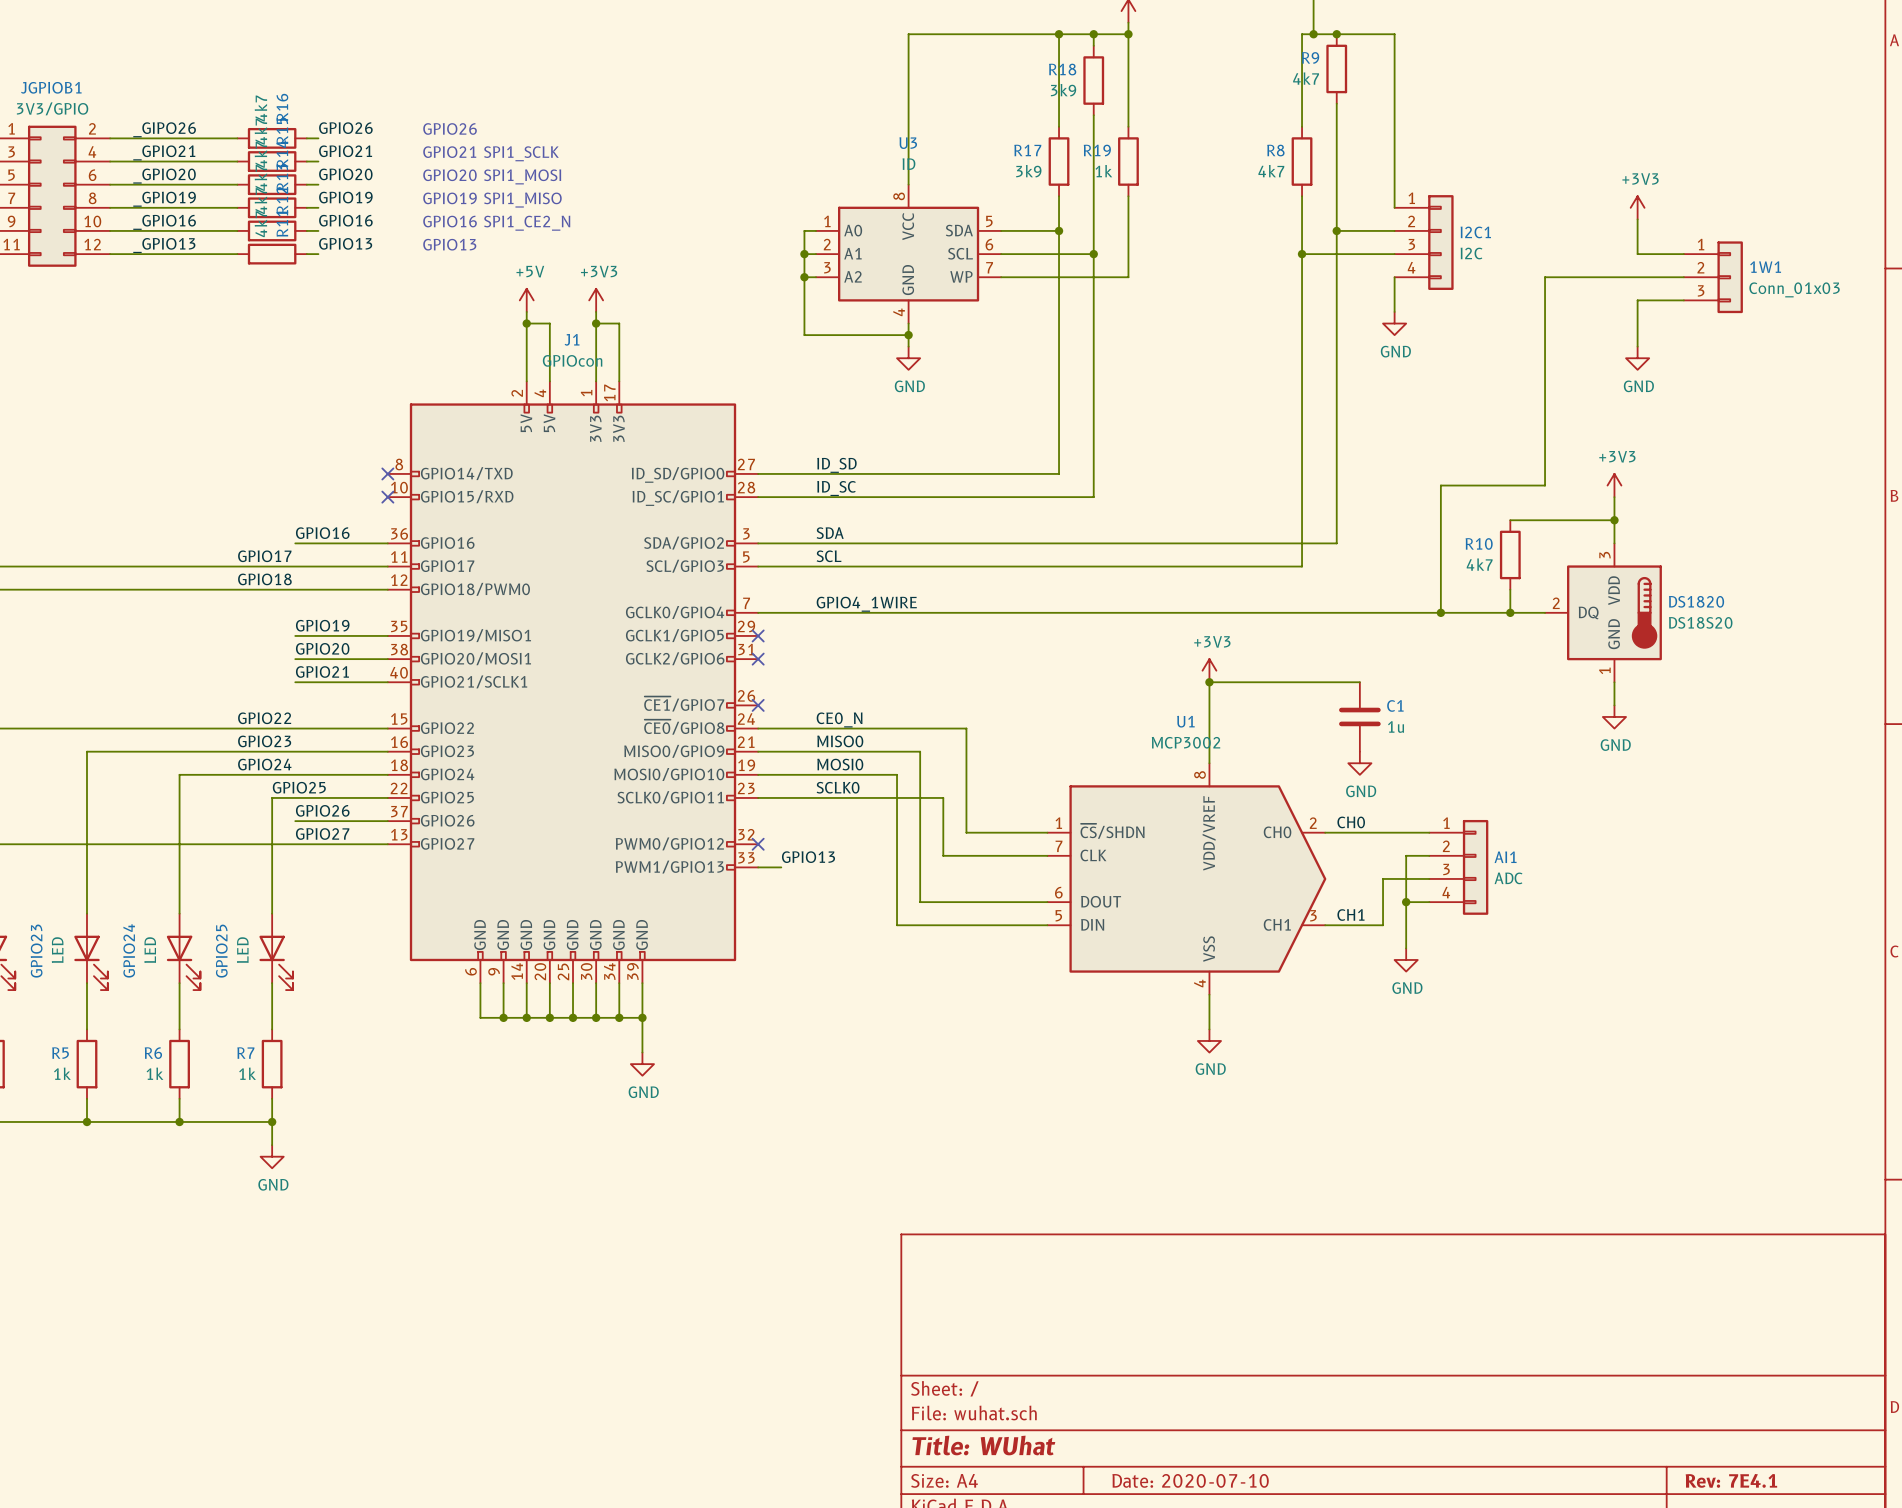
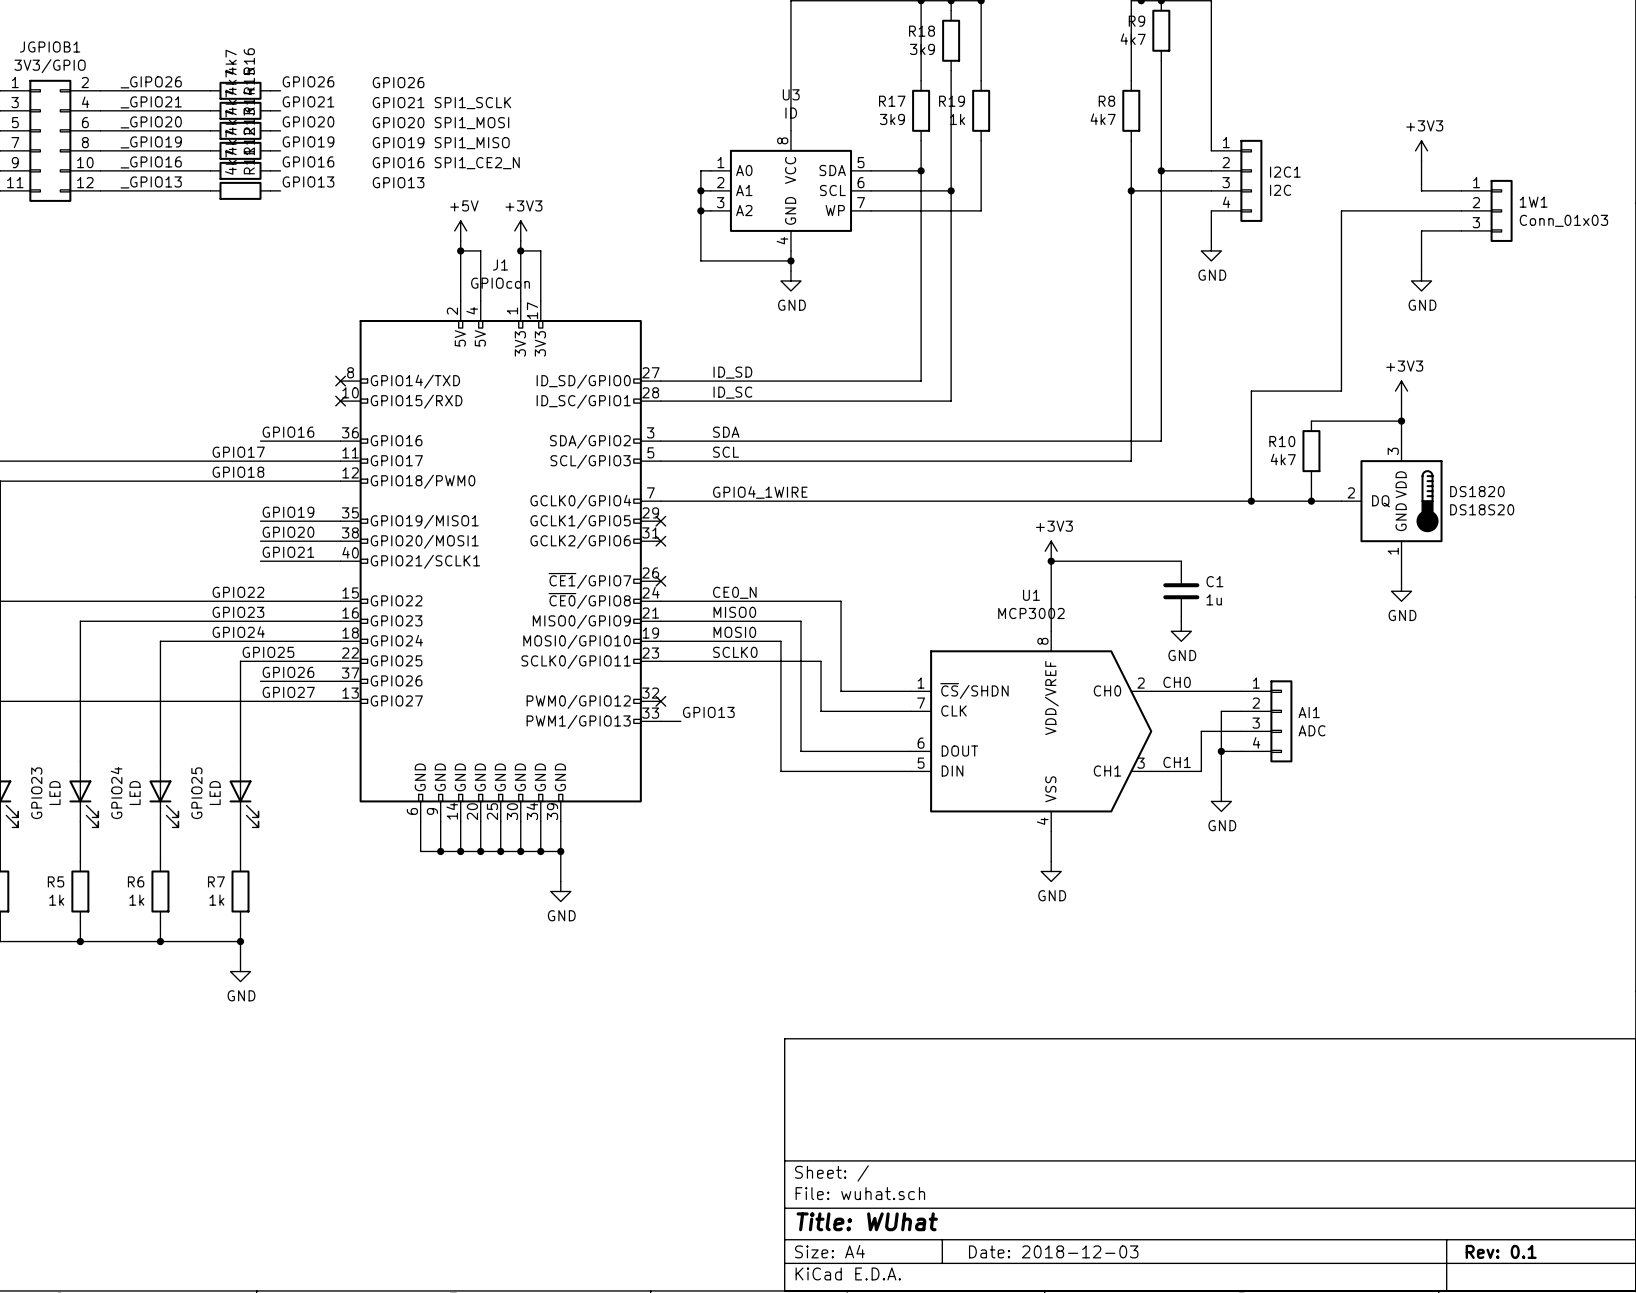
title block: Date: 2020-07-10 (1190, 1480) -> Date: 2018-12-03 (1053, 1251)
title block: Rev: 7E4.1 (1731, 1480) -> Rev: 0.1 (1501, 1251)

